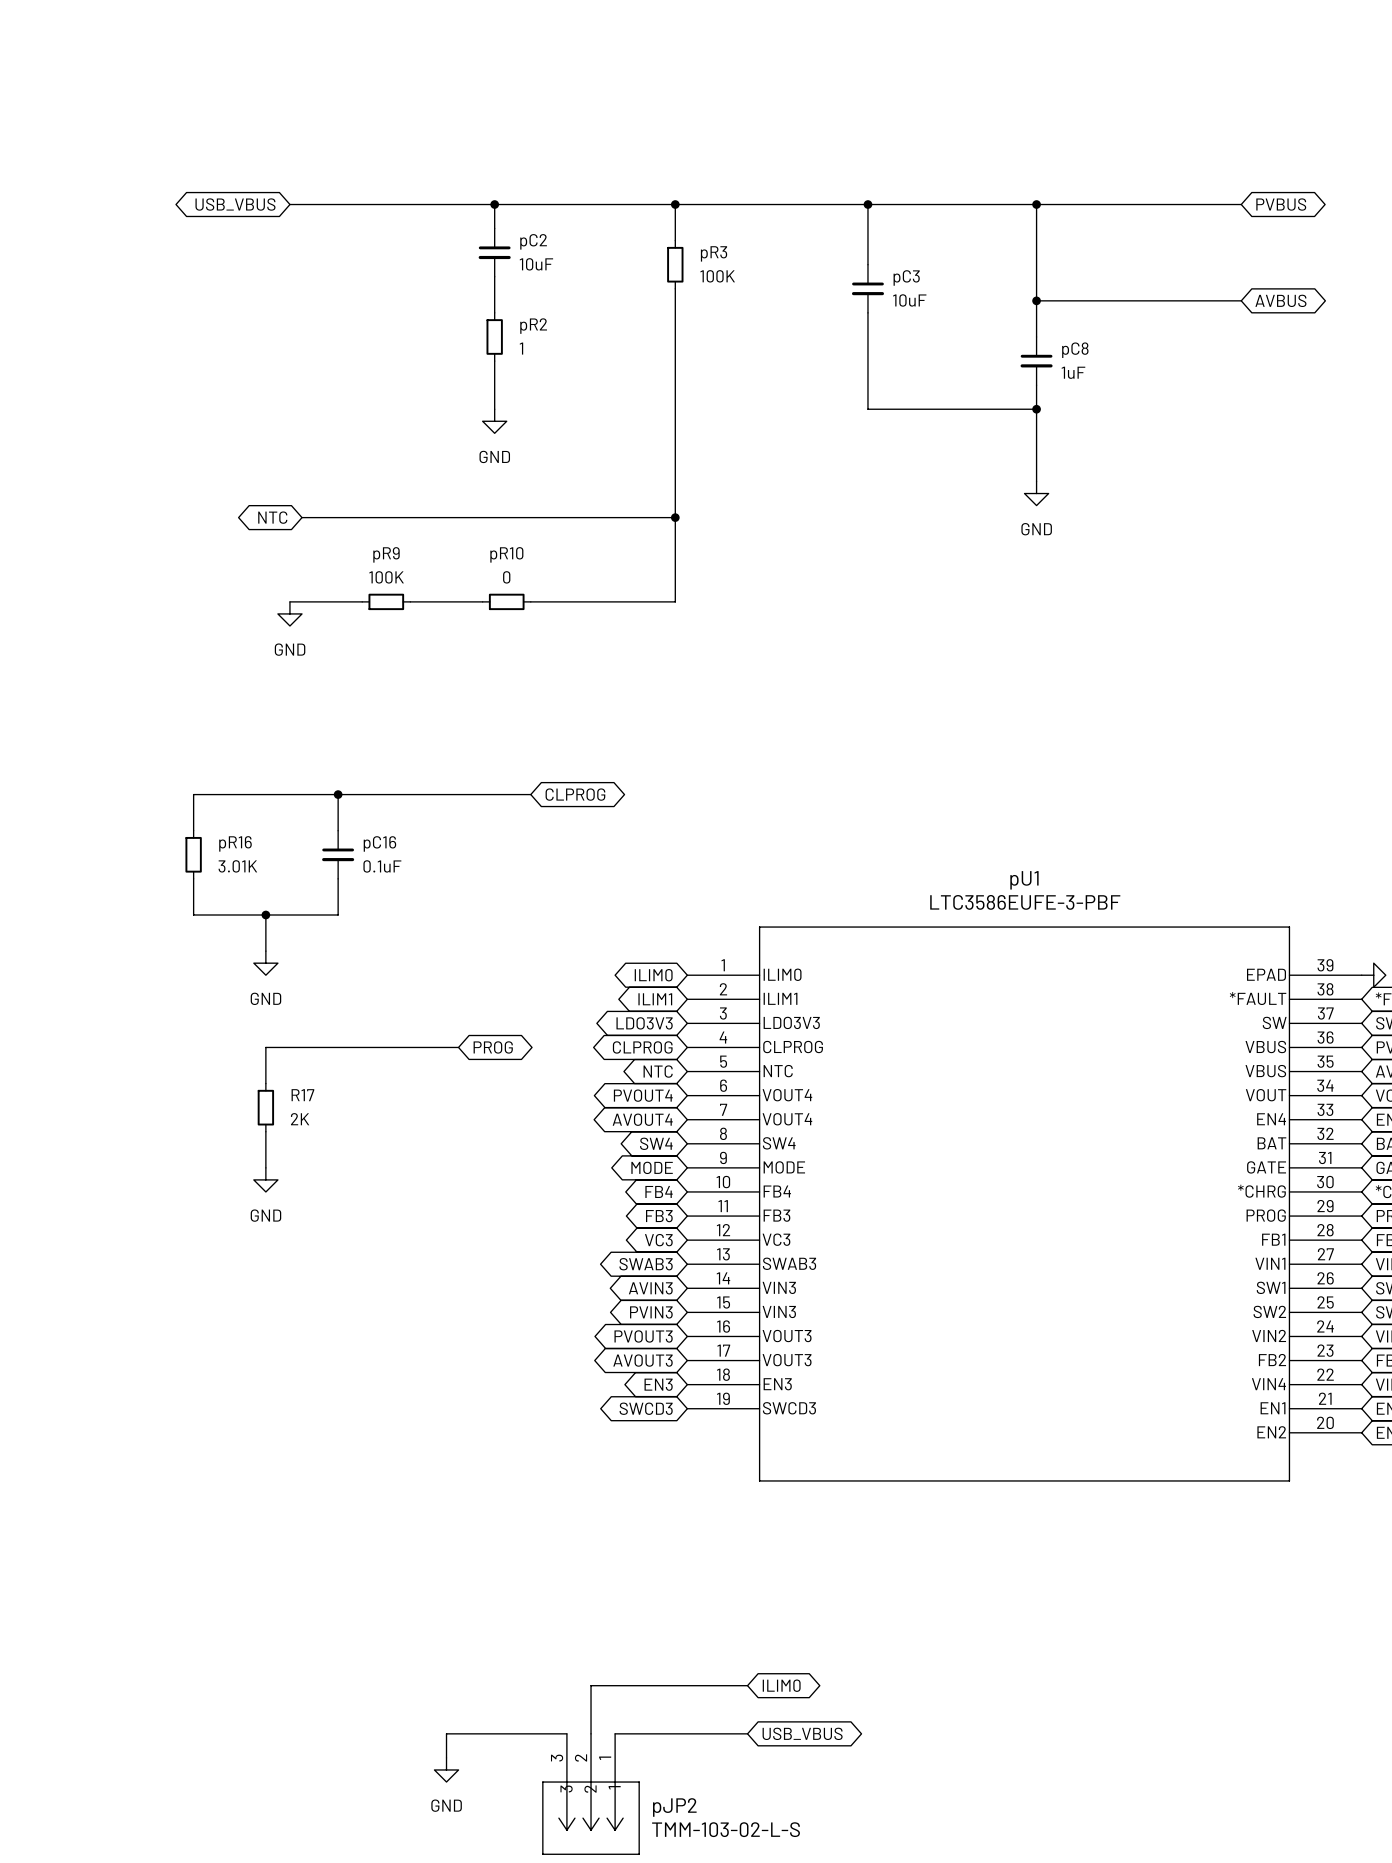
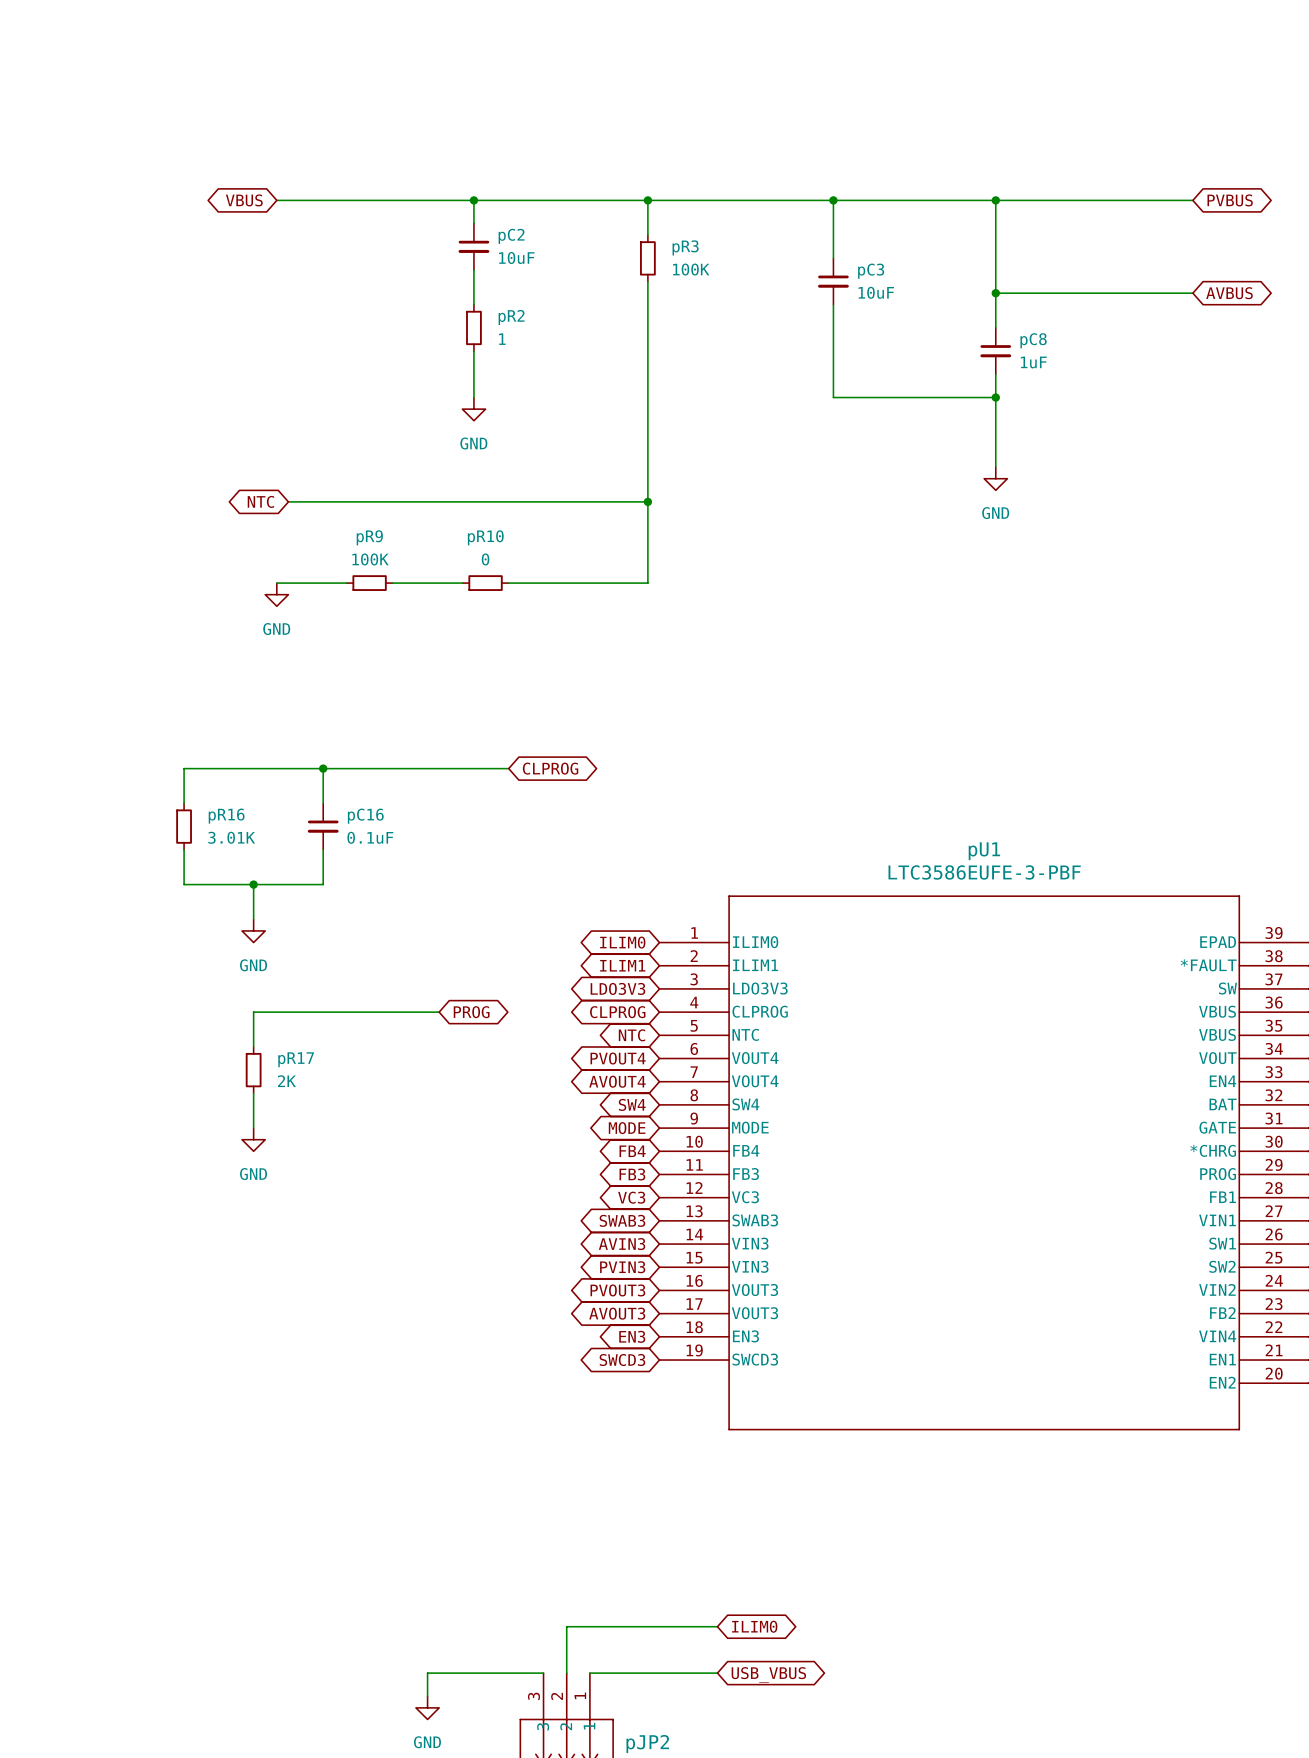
global label: USB_VBUS (235, 204) -> VBUS (244, 200)
R17 name: R17 (302, 1095) -> pR17 (296, 1059)

